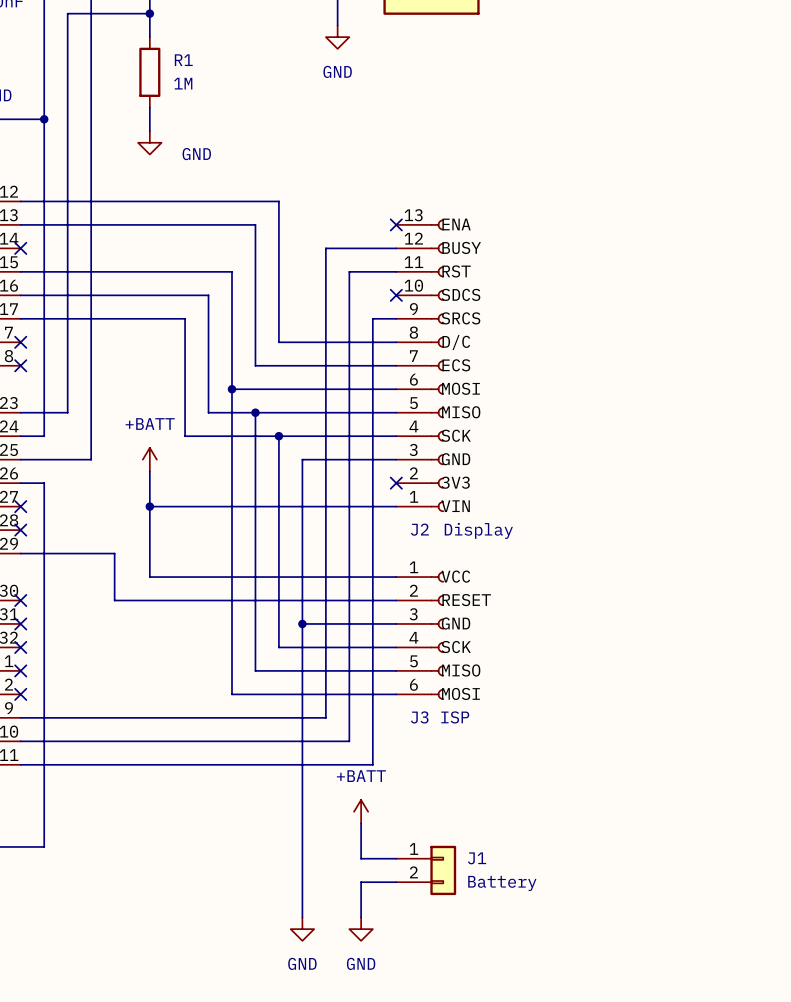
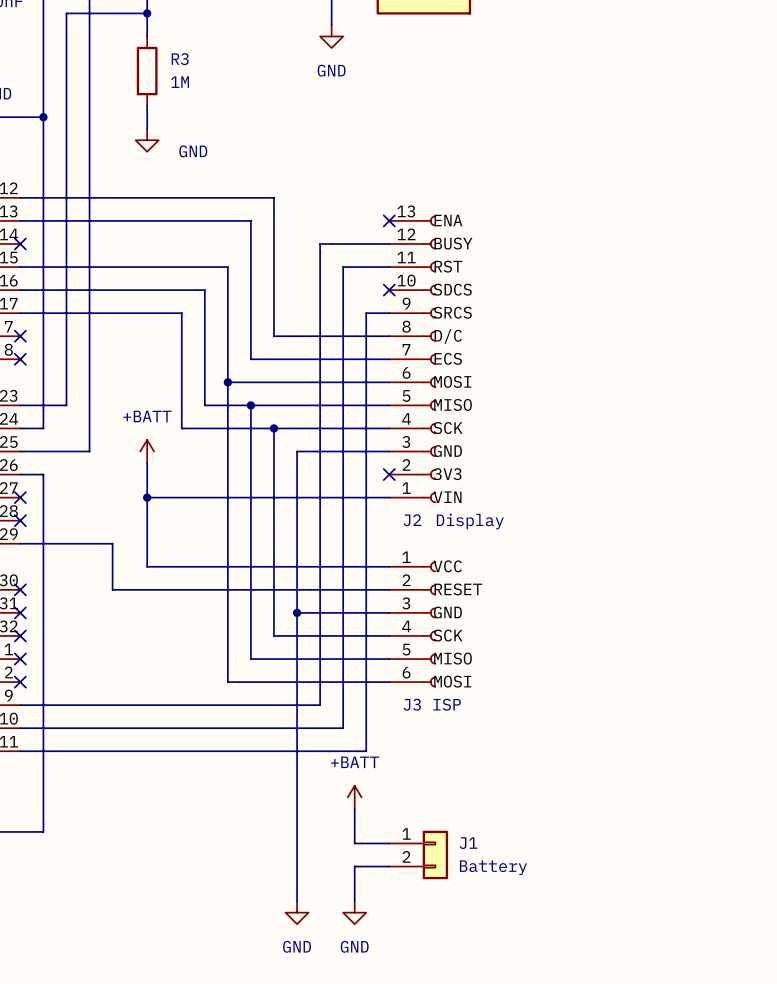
R1 name: R1 (183, 60) -> R3 (180, 59)

